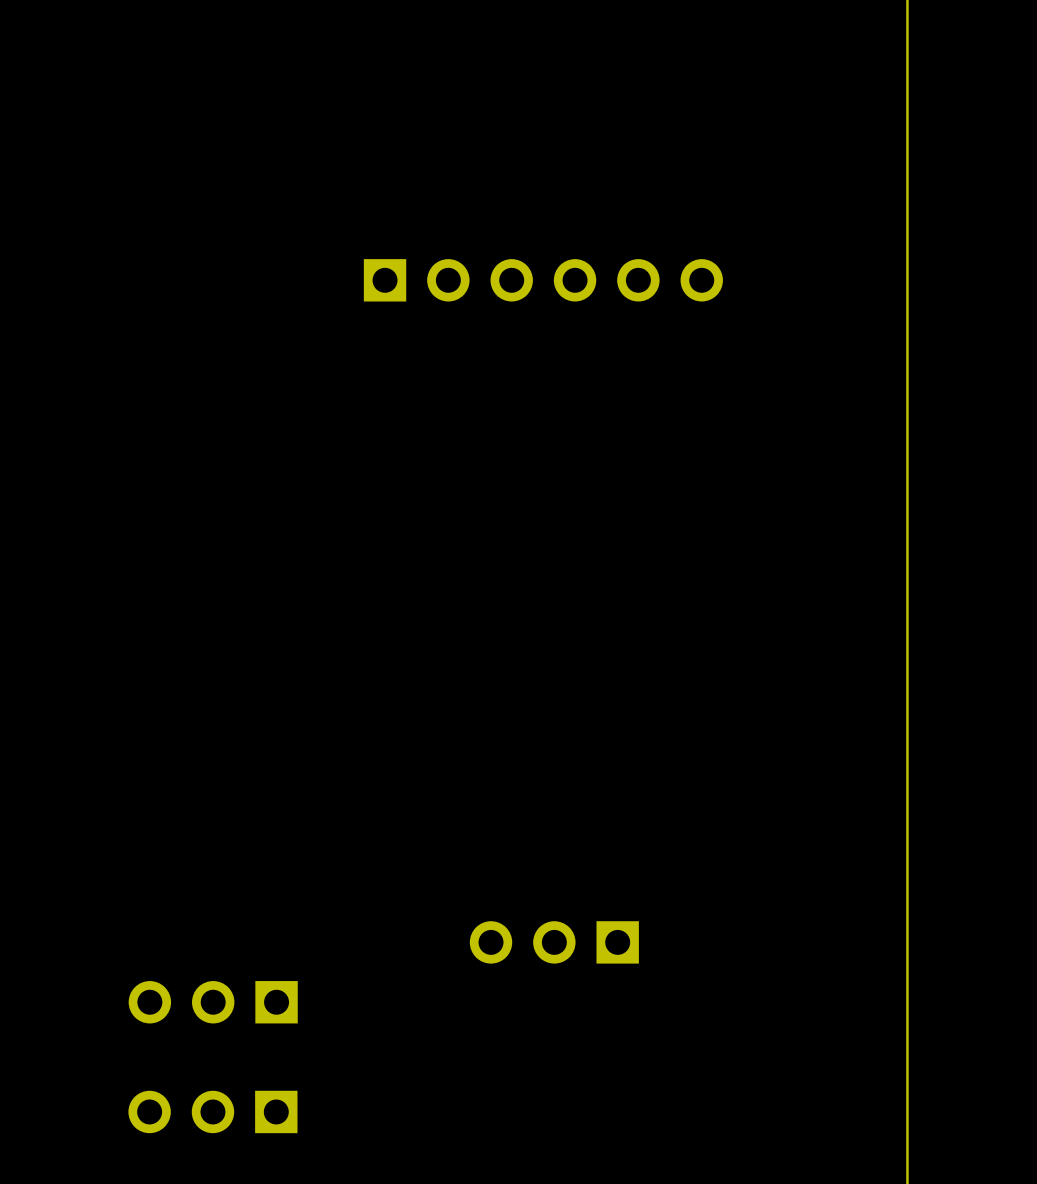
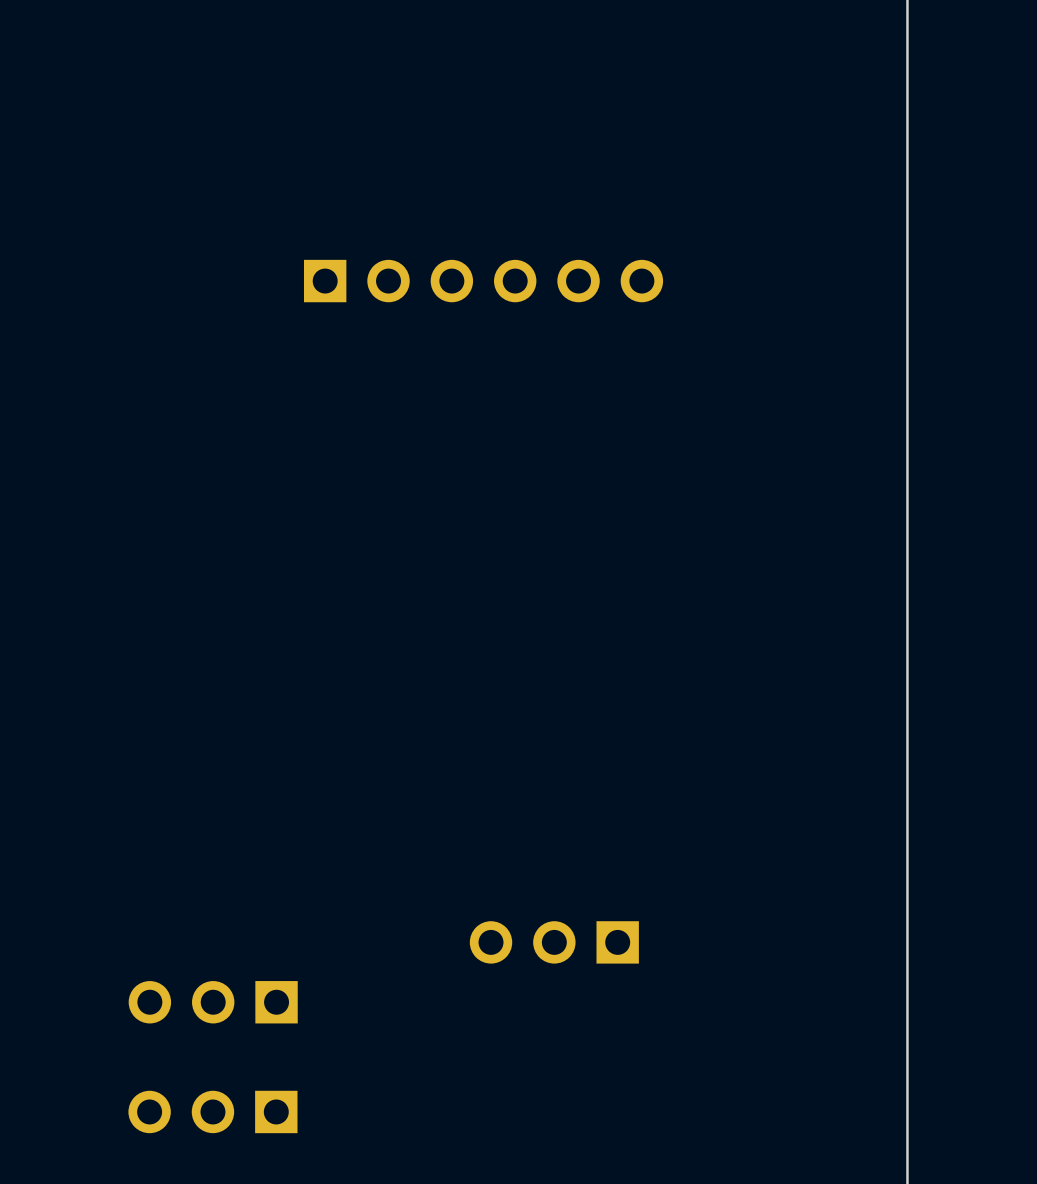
part position: (543, 280) -> (483, 281)

